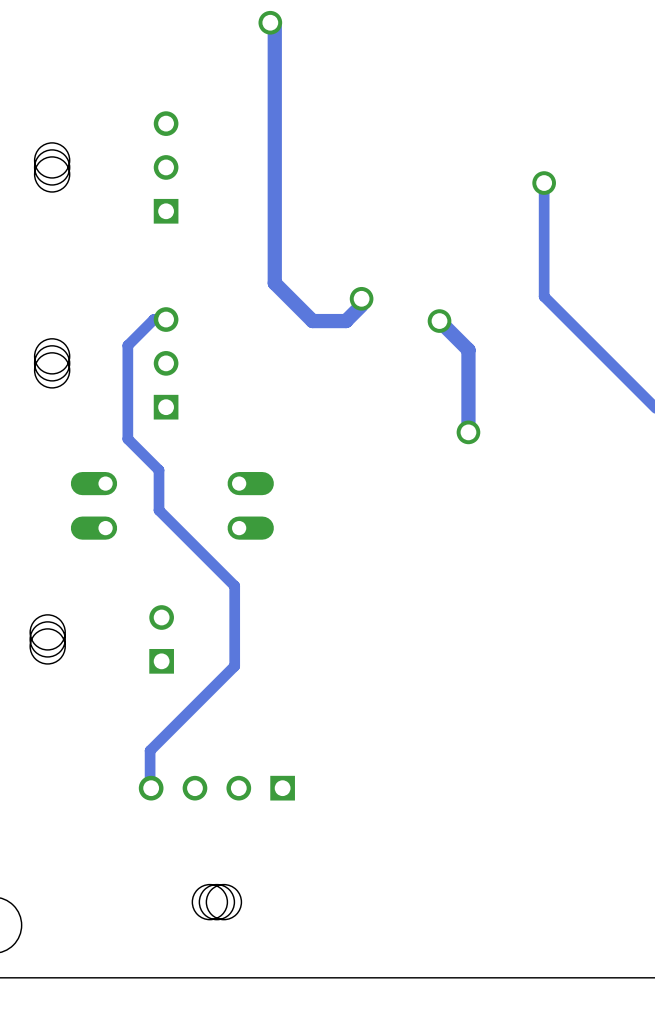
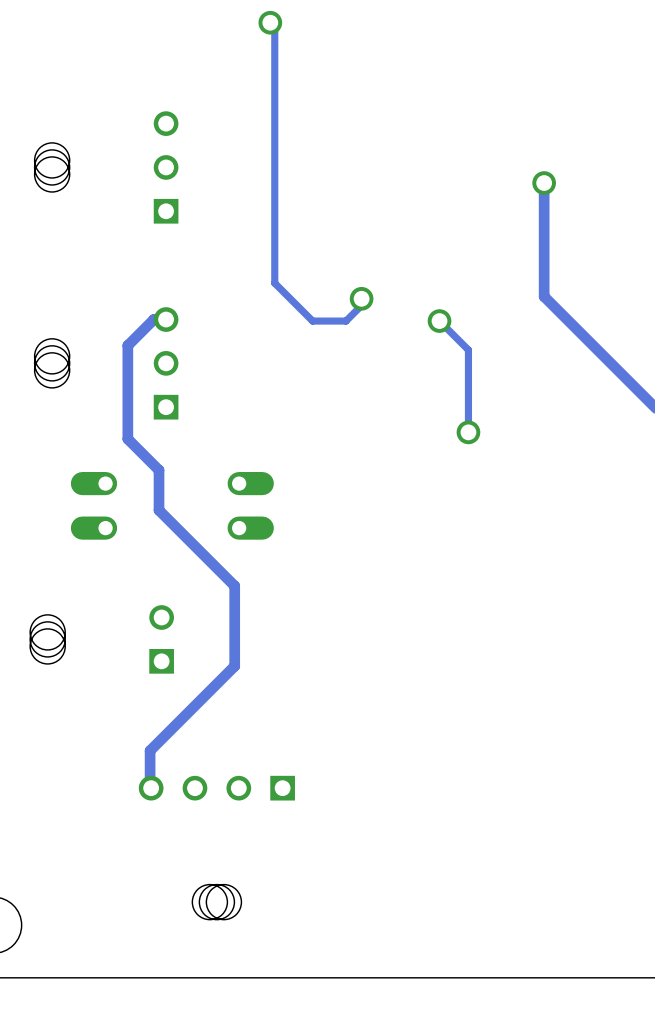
track width: thick (274, 27) (274, 283) (312, 321) (346, 321) (361, 305) -> thin (274, 27) (274, 283) (312, 321) (346, 321) (361, 305)
track width: thick (439, 321) (468, 350) (468, 432) -> thin (439, 321) (468, 350) (468, 432)

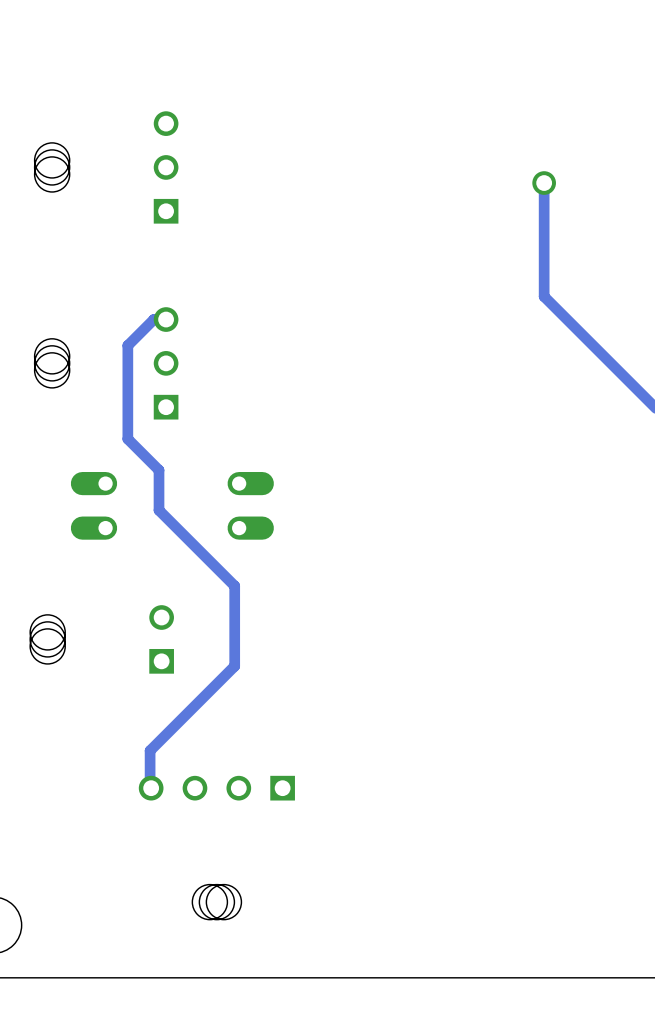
track: (270, 22) (274, 27) (274, 283) (312, 321) (346, 321) (361, 305) (361, 298) -> none
via: (270, 22) -> none
via: (361, 298) -> none
track: (439, 321) (468, 350) (468, 432) -> none
via: (439, 321) -> none
via: (468, 432) -> none

